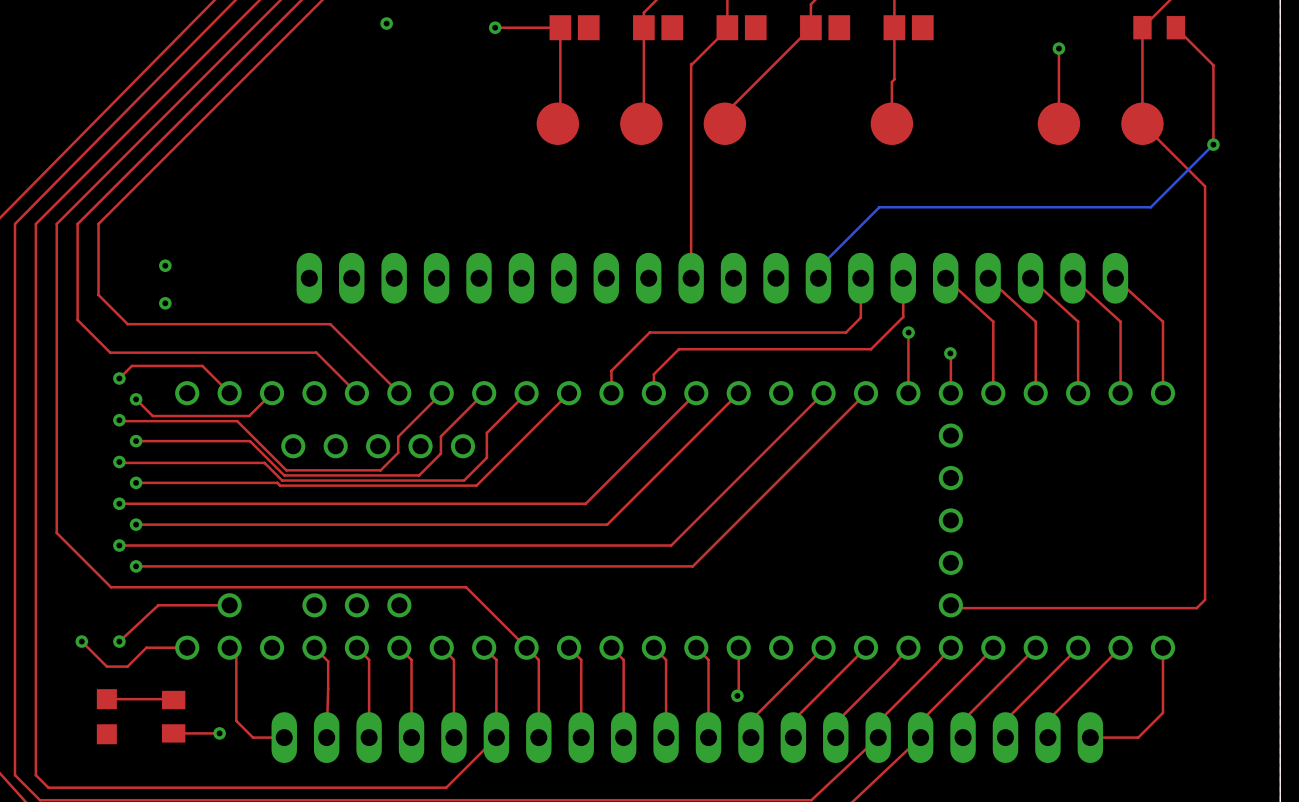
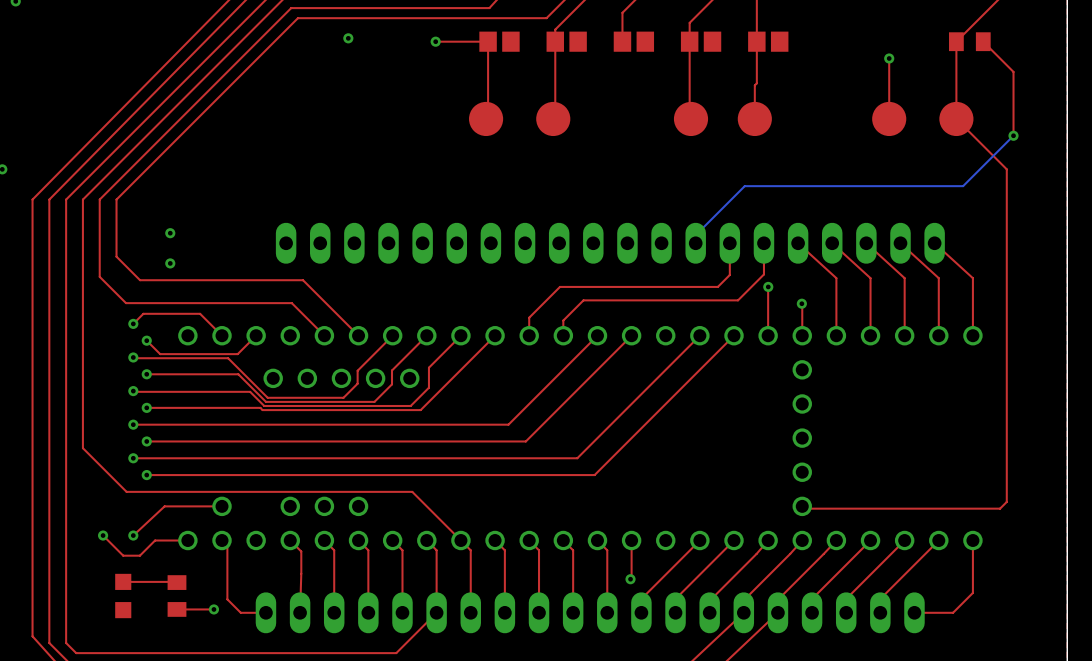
top track: (727, 27) (691, 65) -> none
top track: (810, 27) (724, 113) (724, 123) -> (689, 41) (691, 118)
top track: (691, 63) (691, 278) -> none
part position: (724, 123) -> (691, 118)

